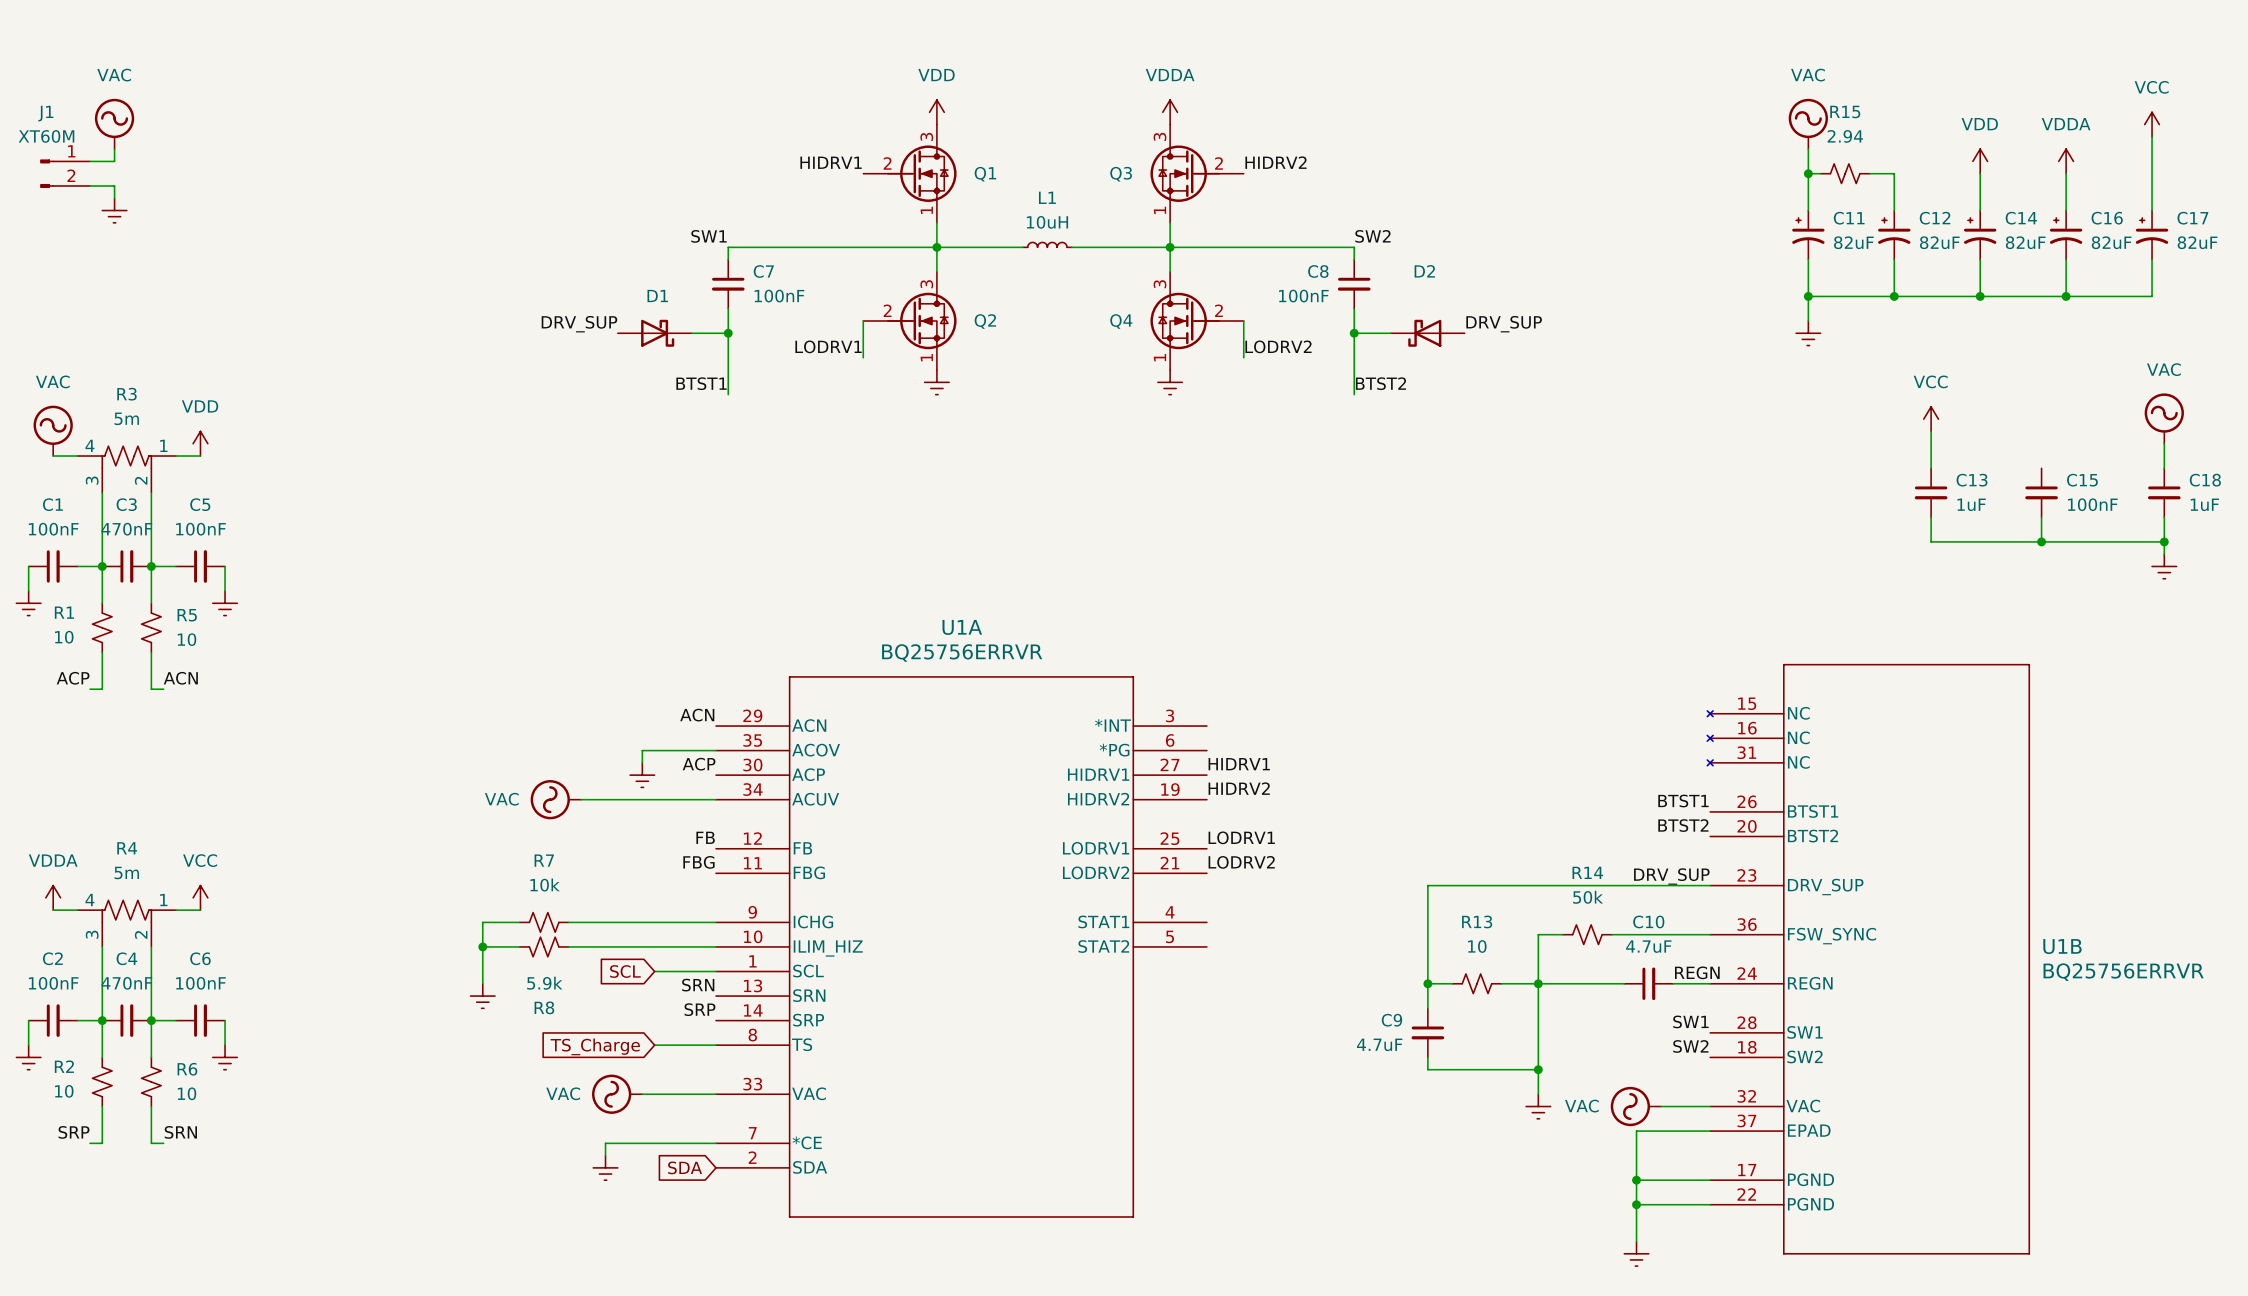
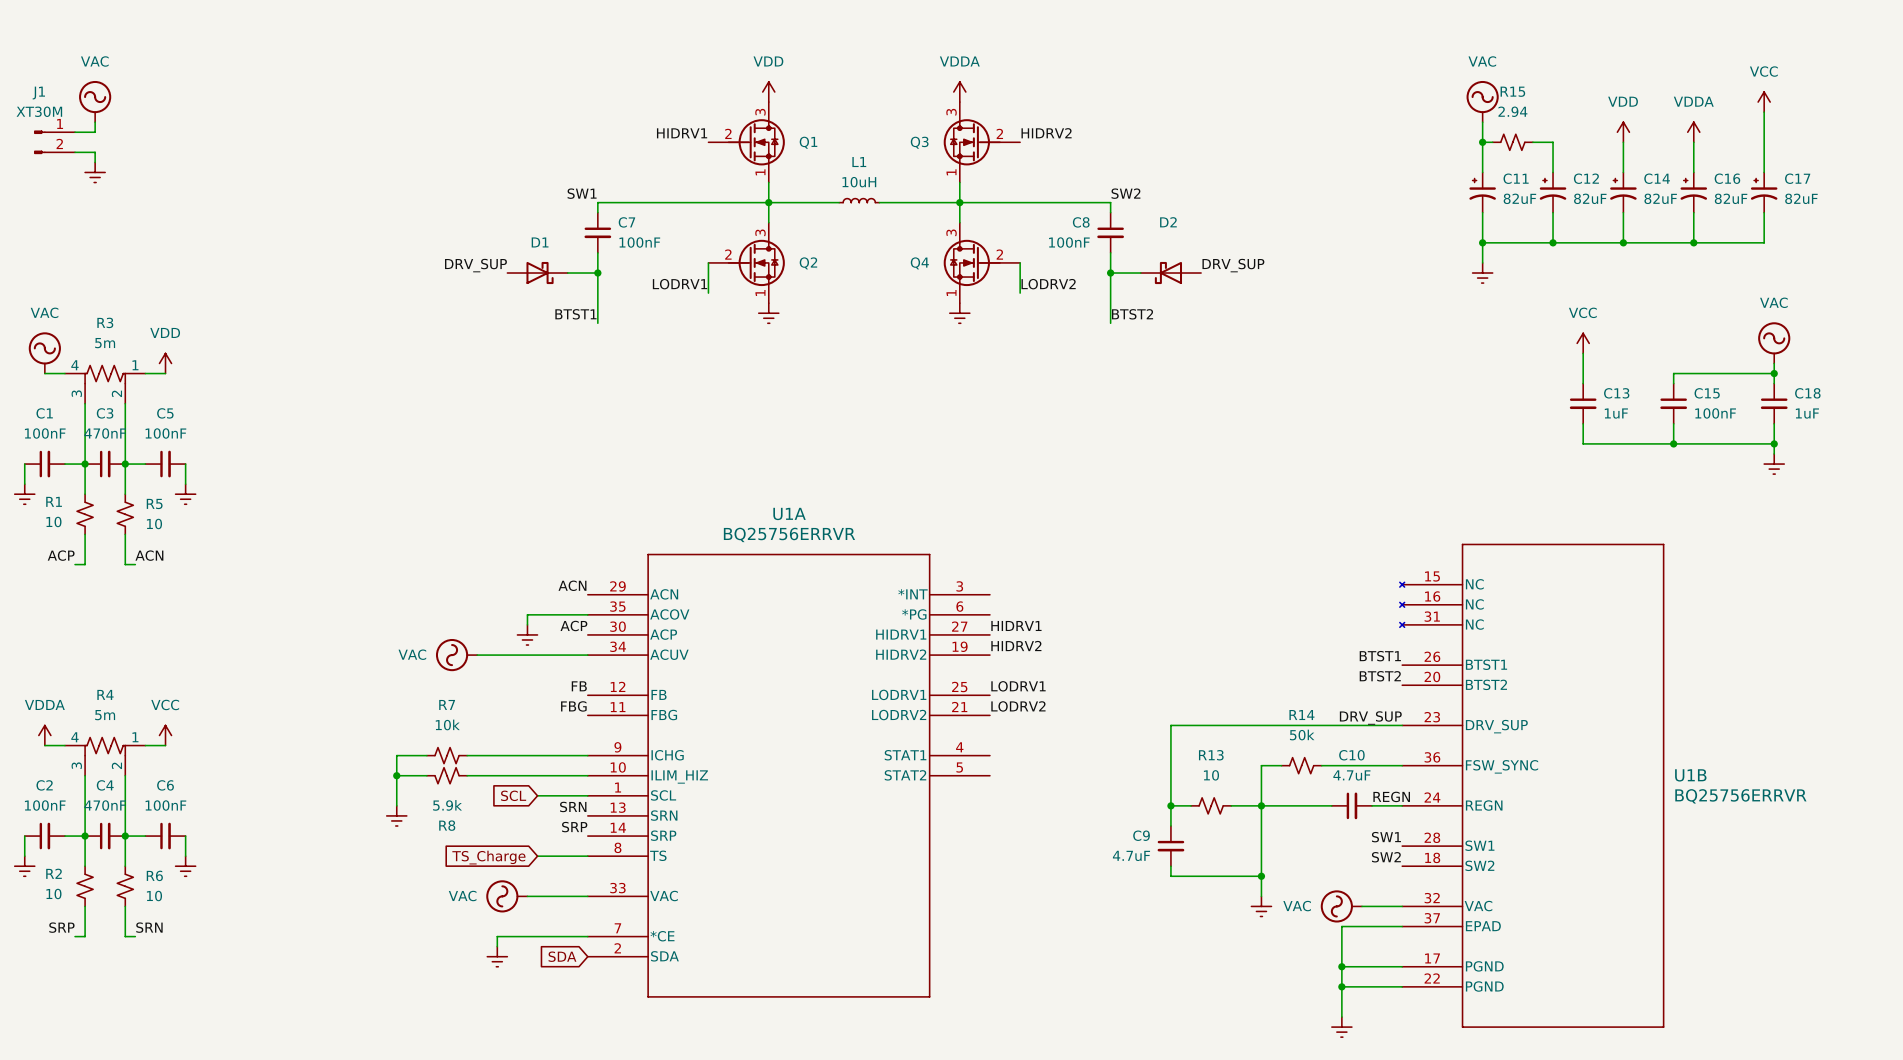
J1 value: XT60M (46, 136) -> XT30M (39, 111)
wire: none -> (1774, 373) (1673, 373) (1673, 383)
junction: none -> (1774, 373)

